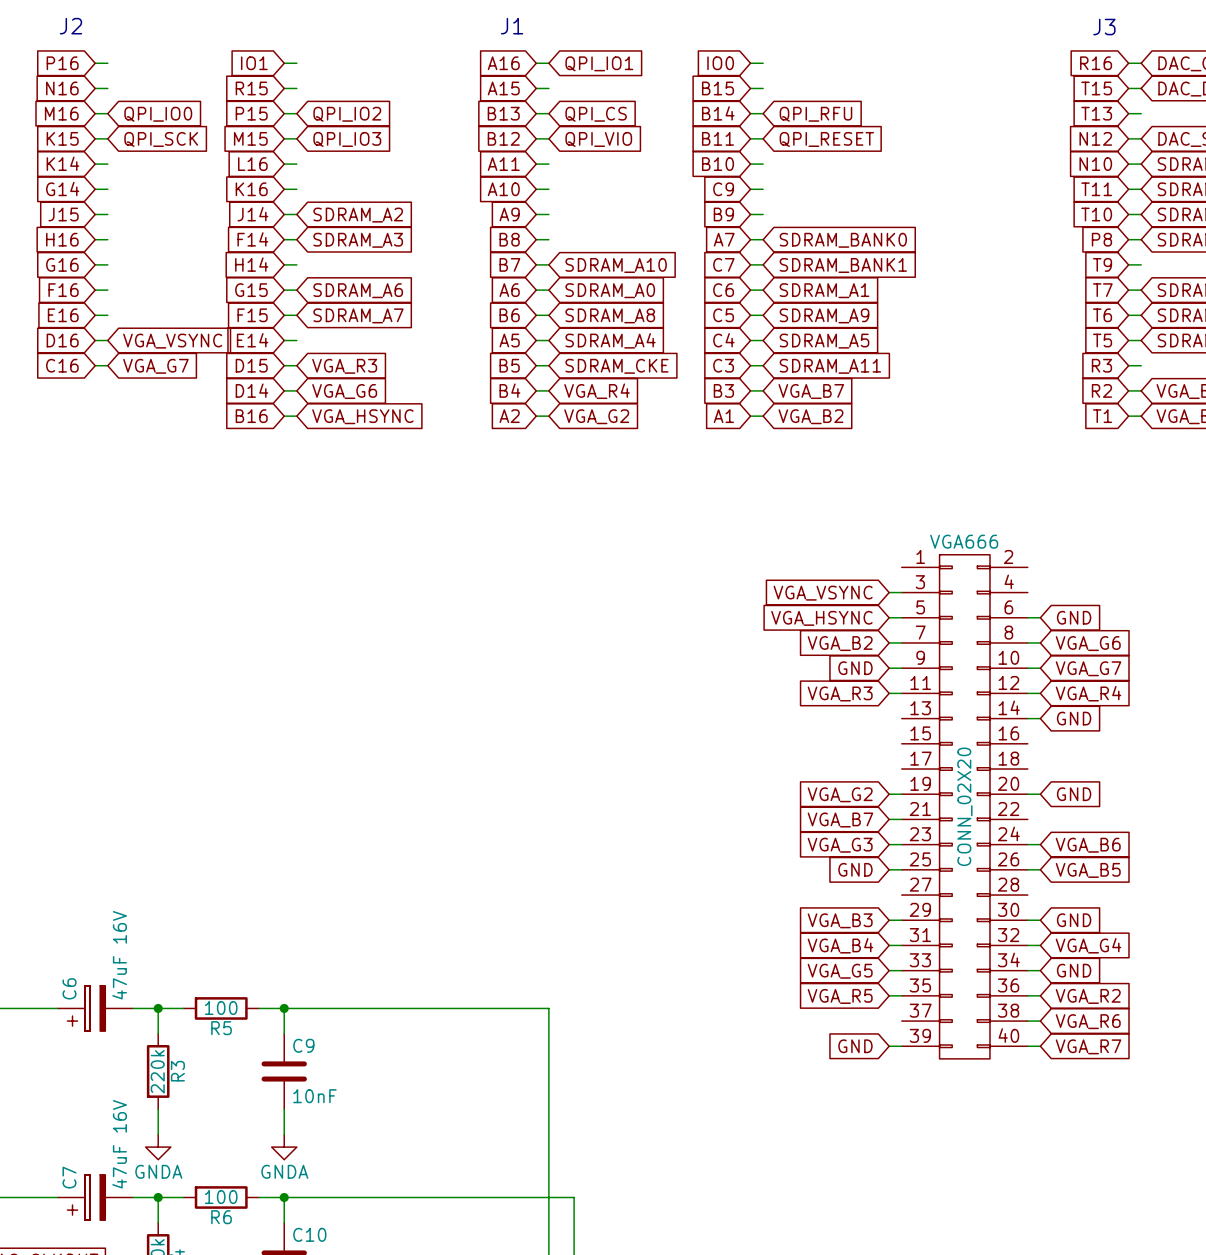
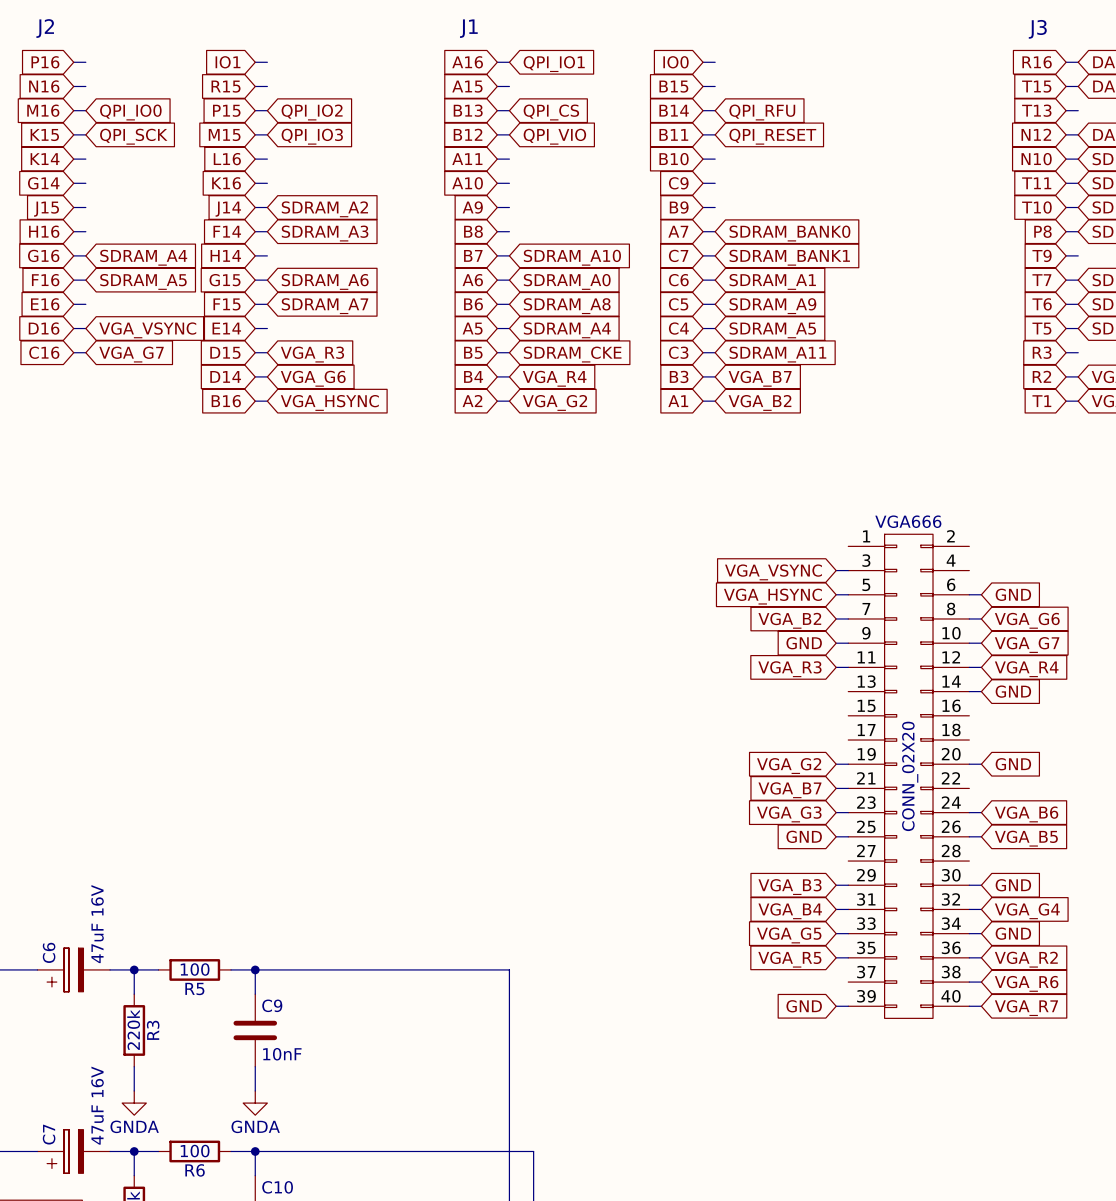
global label: none -> SDRAM_A4 (143, 257)
global label: none -> SDRAM_A5 (143, 281)

